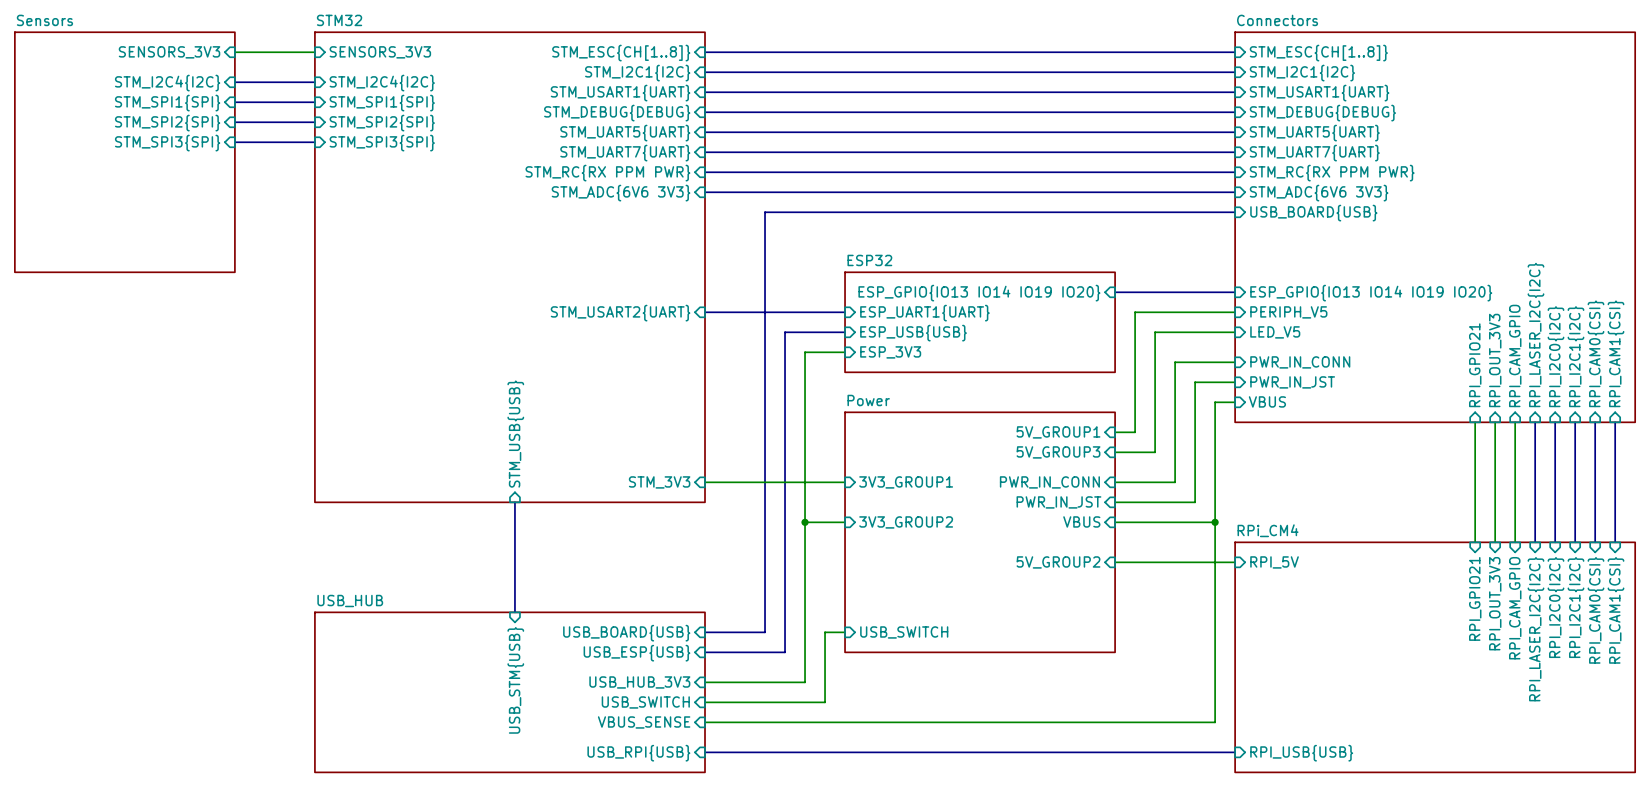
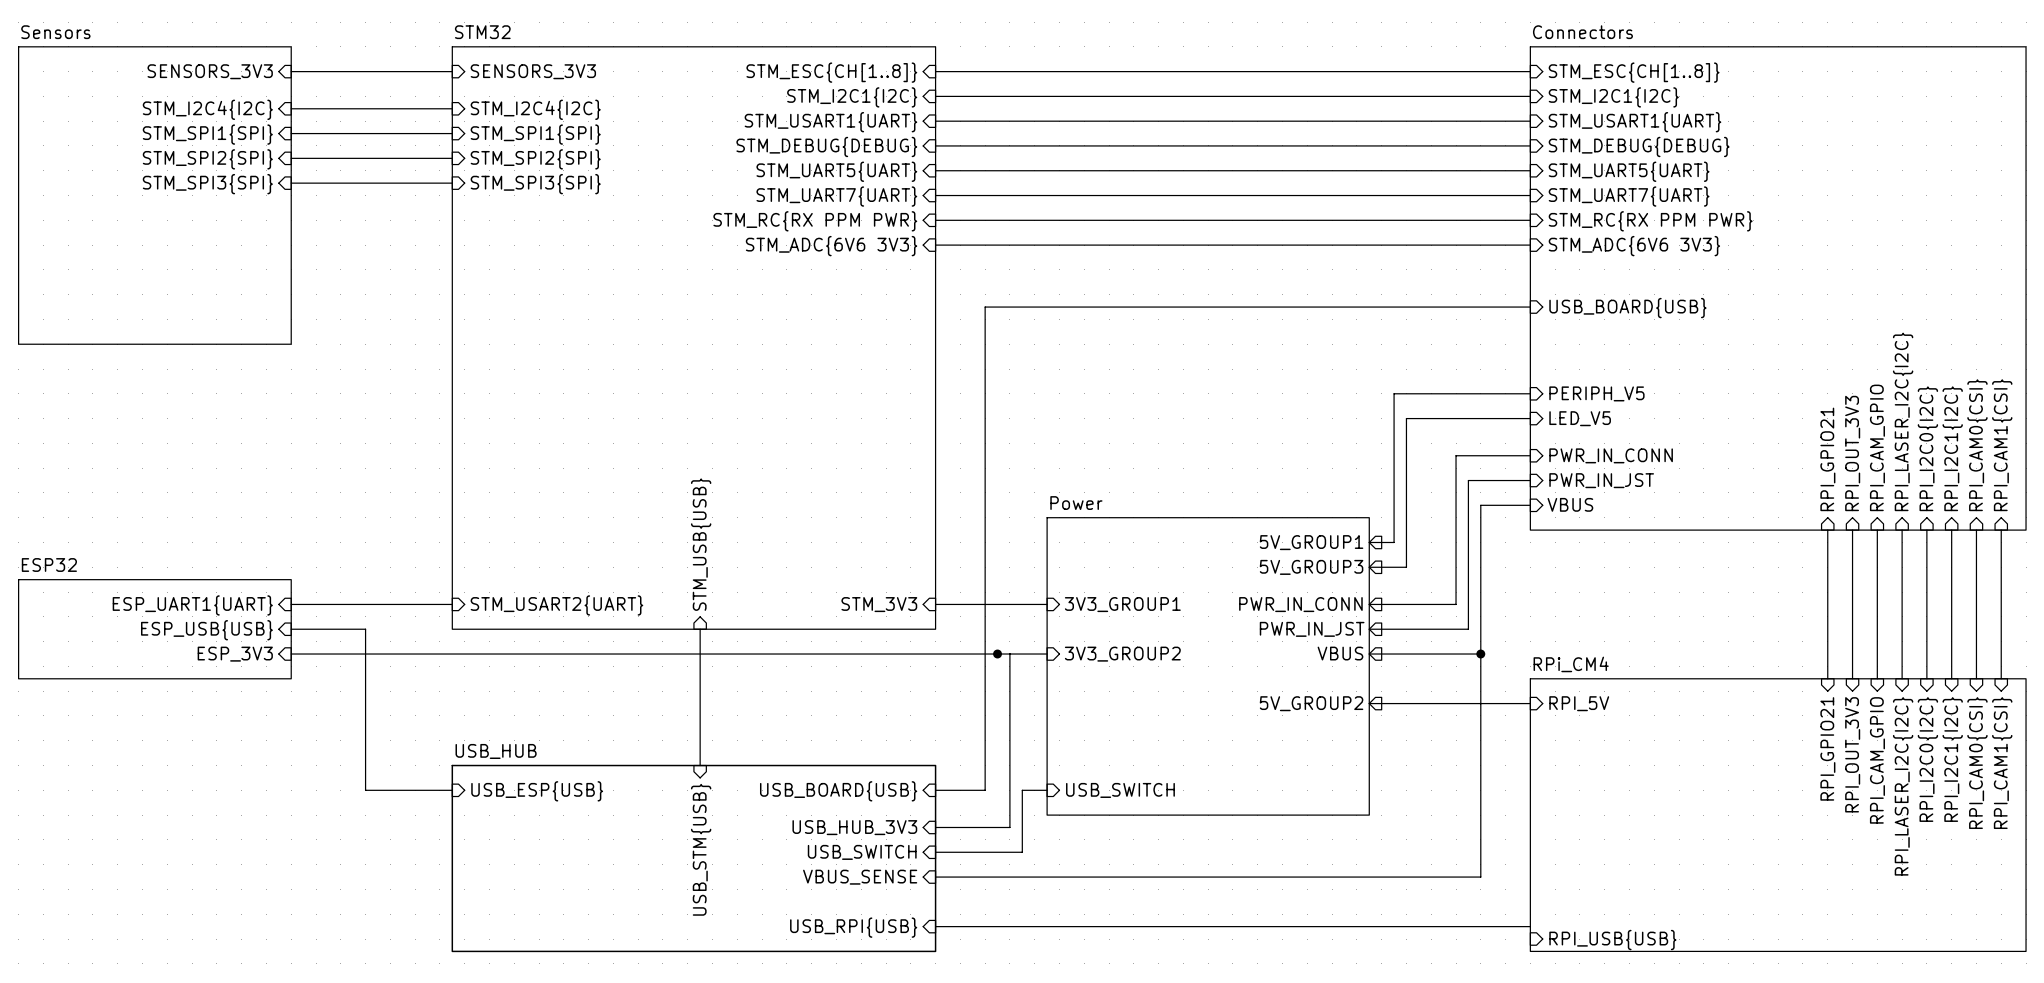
wire: none -> (390, 71) (452, 71)
sheet pin position: SENSORS_3V3 (380, 52) -> SENSORS_3V3 (533, 71)
bus: (705, 52) (755, 52) -> none
sheet pin position: STM_ESC{CH[1..8]} (621, 53) -> STM_ESC{CH[1..8]} (831, 72)
bus: (705, 72) (755, 72) -> none
sheet pin position: STM_I2C1{I2C} (637, 73) -> STM_I2C1{I2C} (852, 97)
bus: none -> (390, 108) (452, 108)
sheet pin position: STM_I2C4{I2C} (382, 83) -> STM_I2C4{I2C} (535, 109)
bus: (705, 92) (755, 92) -> none
sheet pin position: STM_USART1{UART} (620, 93) -> STM_USART1{UART} (830, 122)
bus: none -> (390, 133) (452, 133)
sheet pin position: STM_SPI1{SPI} (382, 103) -> STM_SPI1{SPI} (535, 134)
bus: (705, 112) (755, 112) -> none
sheet pin position: STM_DEBUG{DEBUG} (617, 113) -> STM_DEBUG{DEBUG} (826, 146)
bus: none -> (390, 158) (452, 158)
sheet pin position: STM_SPI2{SPI} (382, 123) -> STM_SPI2{SPI} (535, 159)
bus: (705, 132) (755, 132) -> none
sheet pin position: STM_UART5{UART} (625, 133) -> STM_UART5{UART} (836, 171)
bus: none -> (390, 183) (452, 183)
sheet pin position: STM_SPI3{SPI} (382, 143) -> STM_SPI3{SPI} (535, 184)
bus: (705, 152) (755, 152) -> none
sheet pin position: STM_UART7{UART} (625, 153) -> STM_UART7{UART} (836, 196)
bus: (705, 172) (755, 172) -> none
sheet pin position: STM_RC{RX PPM PWR} (607, 173) -> STM_RC{RX PPM PWR} (815, 221)
bus: (705, 192) (755, 192) -> none
sheet pin position: STM_ADC{6V6 3V3} (621, 193) -> STM_ADC{6V6 3V3} (831, 246)
bus: (1235, 212) (765, 212) (765, 632) -> (1530, 307) (985, 307) (985, 790) (947, 790)
sheet pin position: USB_BOARD{USB} (1313, 213) -> USB_BOARD{USB} (1627, 308)
sheet ESP32 name position: ESP32 (869, 260) -> ESP32 (49, 565)
sheet STM32 position: (509, 267) -> (693, 338)
sheet ESP32 shape: [845, 272, 1116, 373] -> [18, 579, 292, 679]
bus: (1115, 292) (1235, 292) -> none
sheet pin: ESP_GPIO{IO13 IO14 IO19 IO20} (979, 293) -> none
sheet pin: ESP_GPIO{IO13 IO14 IO19 IO20} (1371, 293) -> none
bus: (705, 312) (845, 312) -> none
wire: (1135, 312) (1135, 332) -> (1431, 418) (1406, 418)
wire: none -> (1406, 393) (1394, 393) (1394, 542)
sheet pin: STM_USART2{UART} (620, 313) -> none
sheet pin: ESP_UART1{UART} (924, 313) -> none
bus: (845, 332) (785, 332) (785, 652) (705, 652) -> none
wire: (1155, 332) (1155, 452) (1135, 452) -> none
sheet pin: ESP_USB{USB} (913, 333) -> none
wire: (845, 352) (805, 352) (805, 682) -> none
sheet pin: ESP_3V3 (890, 352) -> none
wire: (1195, 382) (1195, 402) -> (1505, 505) (1480, 505)
wire: (1215, 402) (1215, 722) (705, 722) -> none
sheet Power shape: [845, 412, 1116, 653] -> [1047, 517, 1370, 816]
wire: none -> (1369, 542) (1381, 542)
wire: (1125, 432) (1135, 432) -> (1406, 567) (1406, 542)
sheet pin position: STM_USB{USB} (515, 434) -> STM_USB{USB} (701, 544)
wire: none -> (1369, 567) (1381, 567)
bus: none -> (291, 604) (452, 604)
sheet pin position: STM_3V3 (659, 482) -> STM_3V3 (879, 604)
wire: (705, 482) (755, 482) -> none
wire: none -> (1369, 604) (1381, 604)
sheet pin: none -> ESP_UART1{UART} (192, 605)
sheet pin: none -> STM_USART2{UART} (556, 605)
bus: none -> (291, 629) (365, 629) (365, 790) (452, 790)
bus: (514, 502) (514, 612) -> (700, 629) (700, 765)
wire: none -> (1369, 629) (1381, 629)
wire: (1185, 502) (1195, 502) -> (1468, 629) (1468, 480) (1480, 480)
wire: none -> (1480, 629) (1480, 877) (1022, 877)
sheet pin: none -> ESP_USB{USB} (206, 630)
sheet pin: none -> ESP_3V3 (235, 654)
wire: none -> (291, 654) (997, 654)
wire: none -> (1009, 654) (1009, 827) (935, 827)
wire: none -> (1369, 654) (1381, 654)
wire: (1195, 522) (1215, 522) -> none
junction position: (1215, 522) -> (1480, 654)
sheet RPi_CM4 shape: [1235, 542, 1636, 773] -> [1530, 678, 2027, 952]
wire: none -> (1369, 703) (1381, 703)
bus: (705, 632) (755, 632) -> none
sheet pin: none -> USB_ESP{USB} (537, 791)
sheet pin position: USB_BOARD{USB} (626, 633) -> USB_BOARD{USB} (838, 791)
sheet pin: USB_ESP{USB} (636, 653) -> none
sheet pin position: USB_STM{USB} (515, 680) -> USB_STM{USB} (701, 849)
sheet pin position: USB_HUB_3V3 (639, 682) -> USB_HUB_3V3 (854, 827)
wire: (705, 682) (755, 682) -> none
wire: (825, 682) (825, 702) -> (1022, 852) (997, 852)
sheet USB_HUB: none -> (693, 858)
sheet USB_HUB: (509, 692) -> none
sheet pin position: USB_SWITCH (645, 702) -> USB_SWITCH (862, 852)
wire: (705, 702) (755, 702) -> none
sheet pin position: VBUS_SENSE (644, 722) -> VBUS_SENSE (860, 877)
bus: none -> (935, 926) (1530, 926)
bus: (705, 752) (1235, 752) -> none
sheet pin position: USB_RPI{USB} (638, 753) -> USB_RPI{USB} (853, 927)

